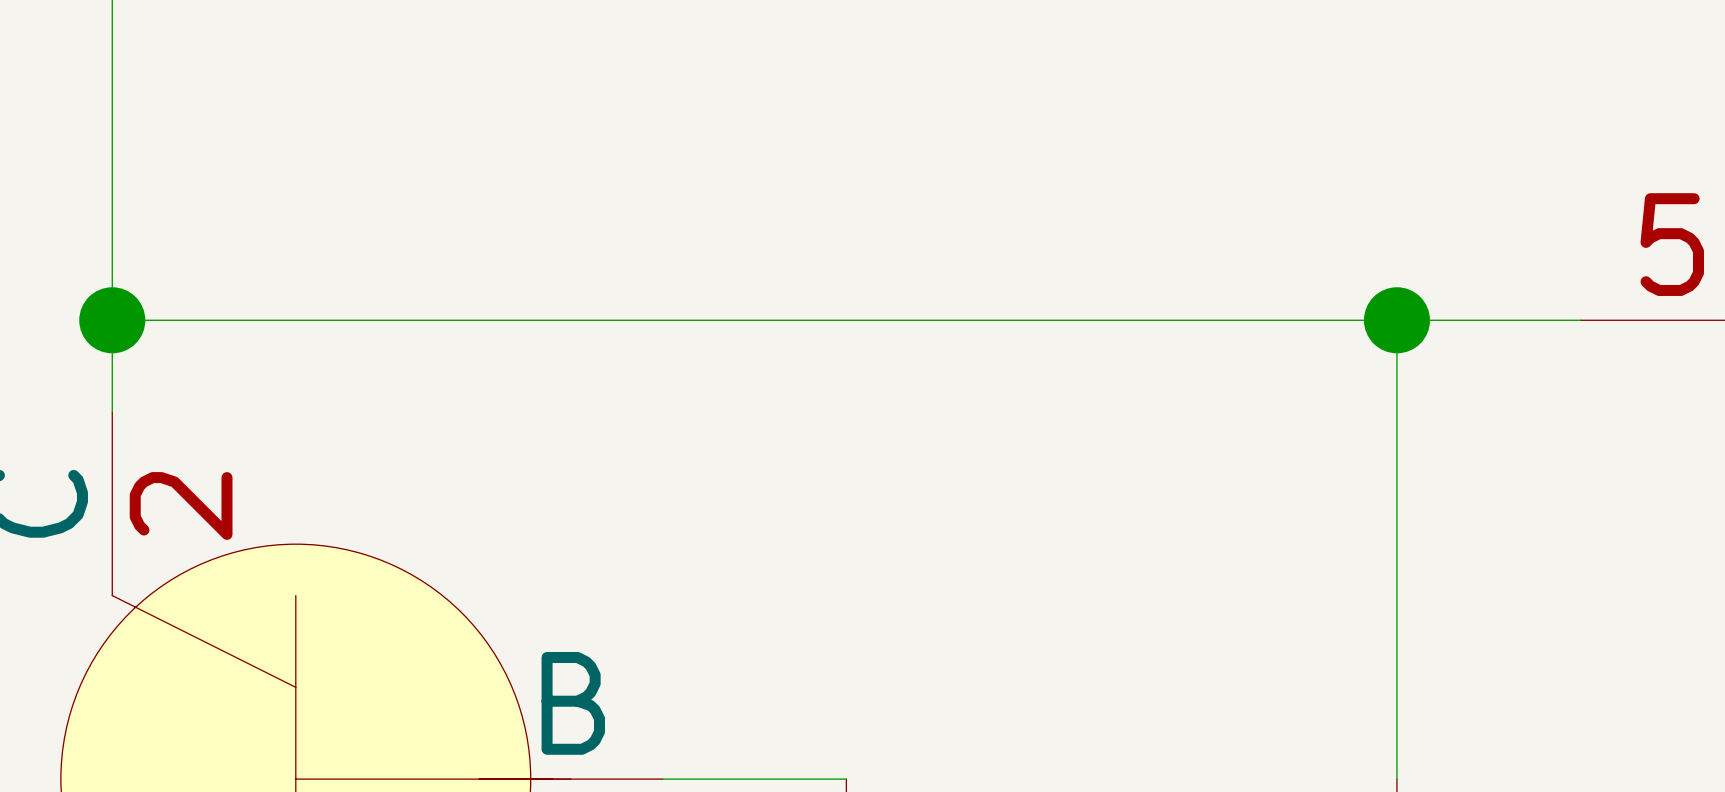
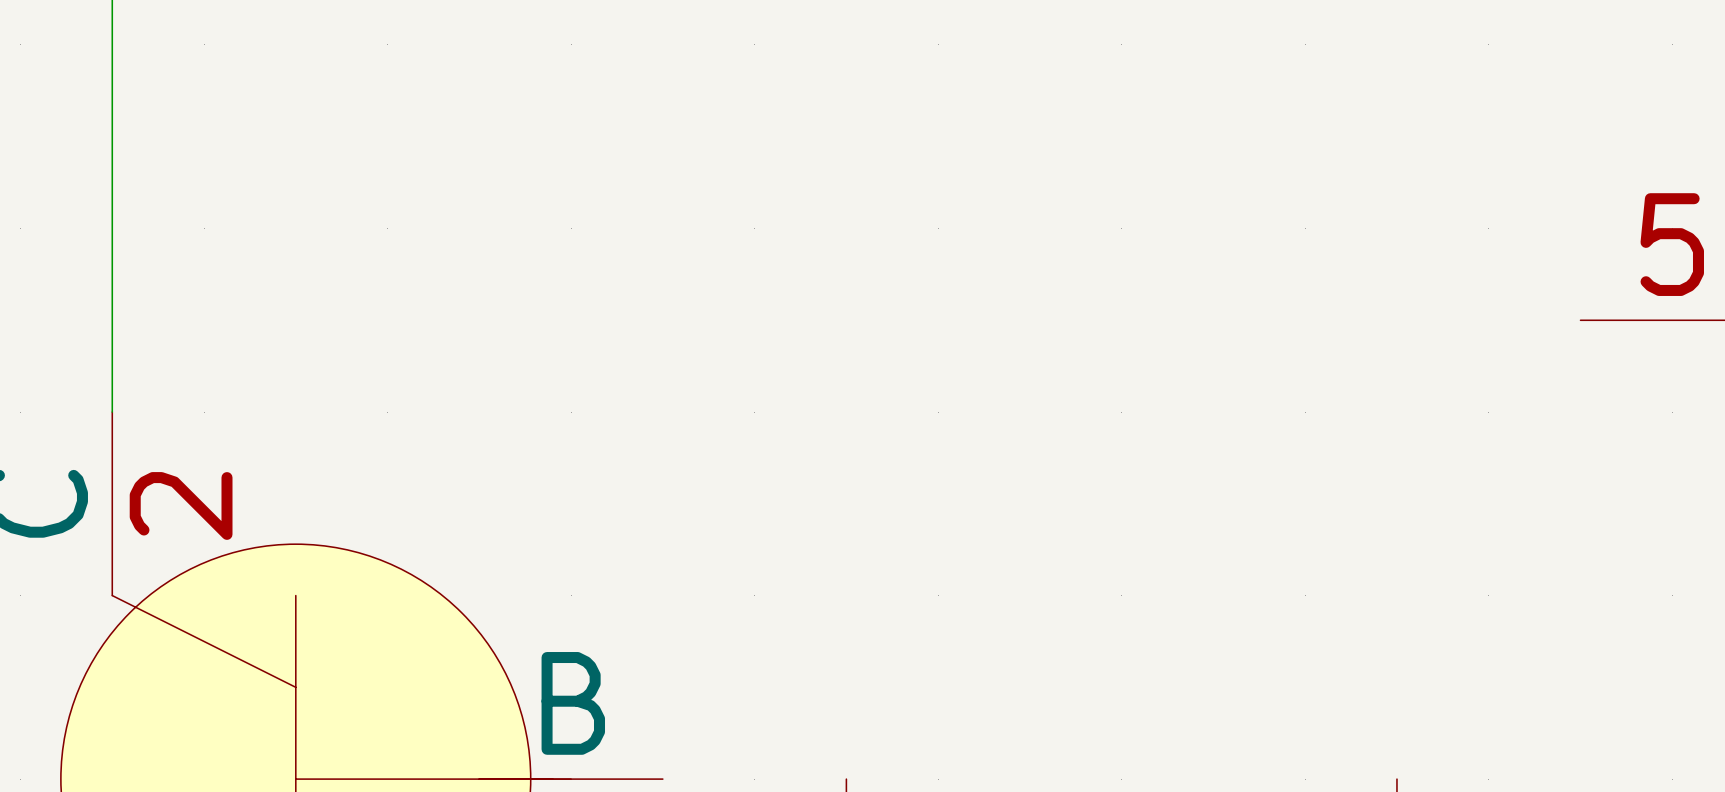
wire: (112, 320) (1580, 320) -> none
junction: (112, 320) -> none
wire: (1396, 320) (1396, 779) -> none
junction: (1396, 320) -> none
wire: (662, 779) (846, 779) -> none

